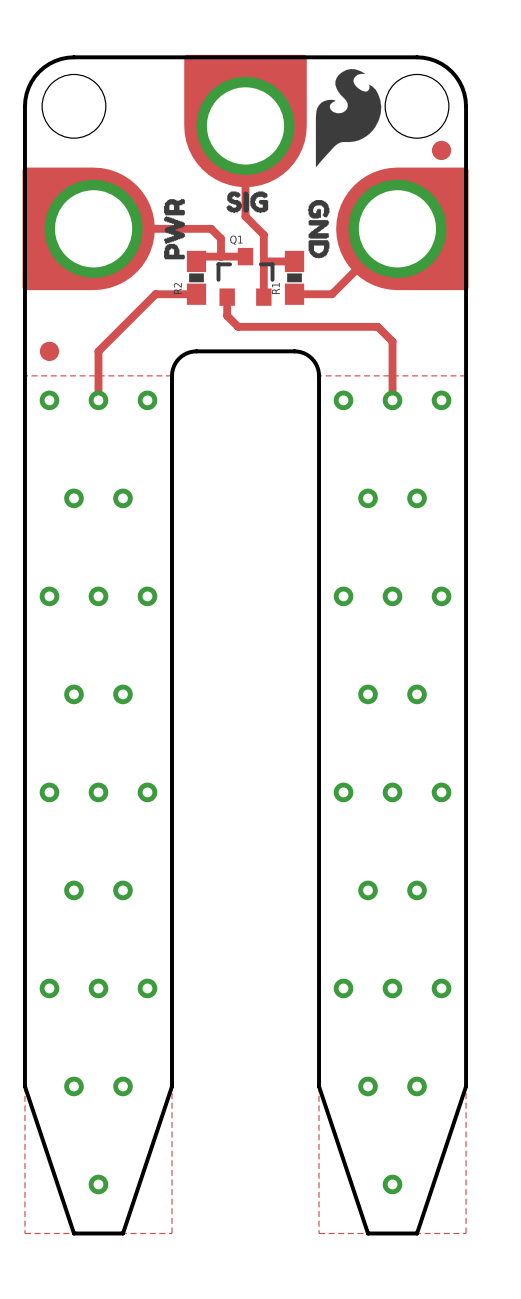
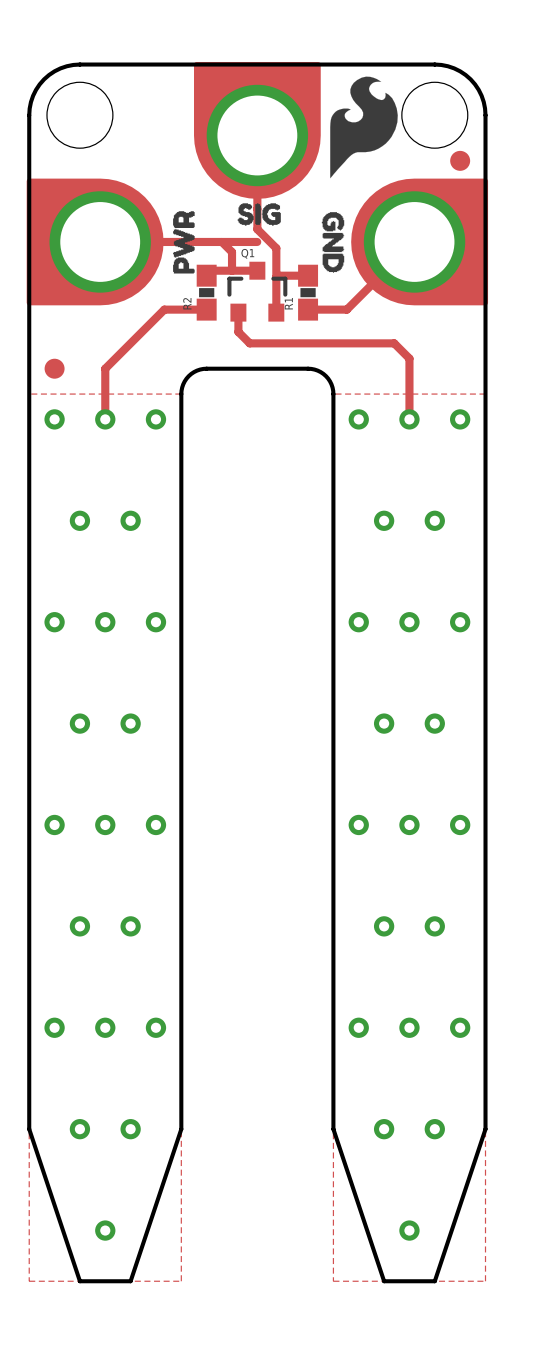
track: none -> (221, 241) (257, 241)

